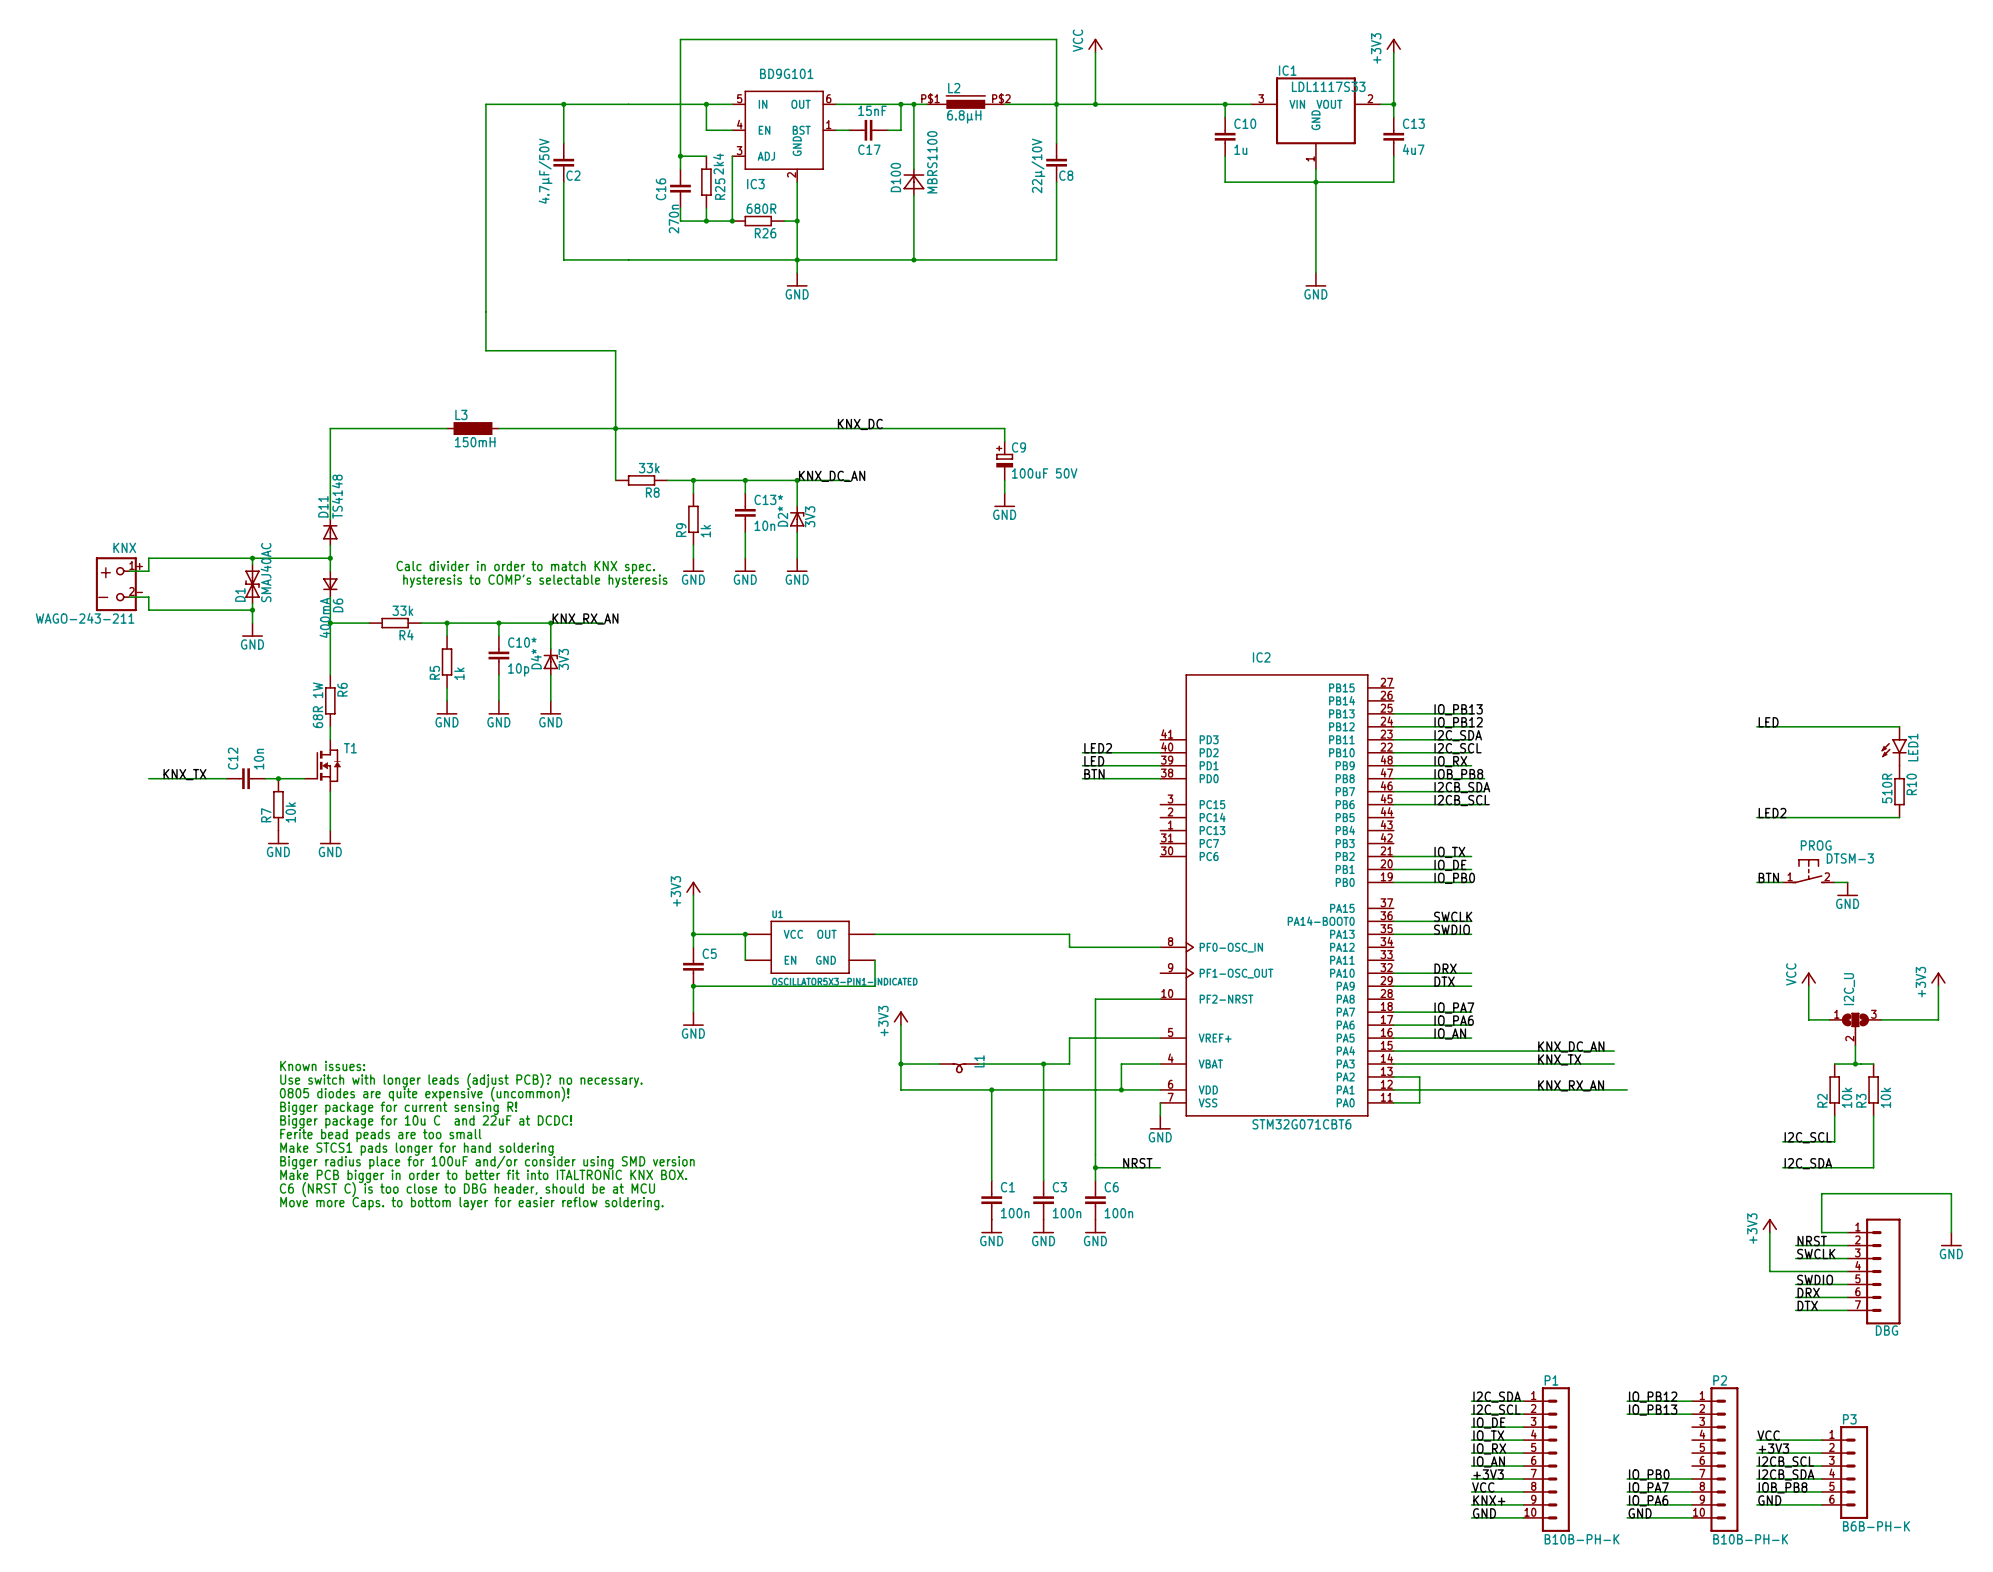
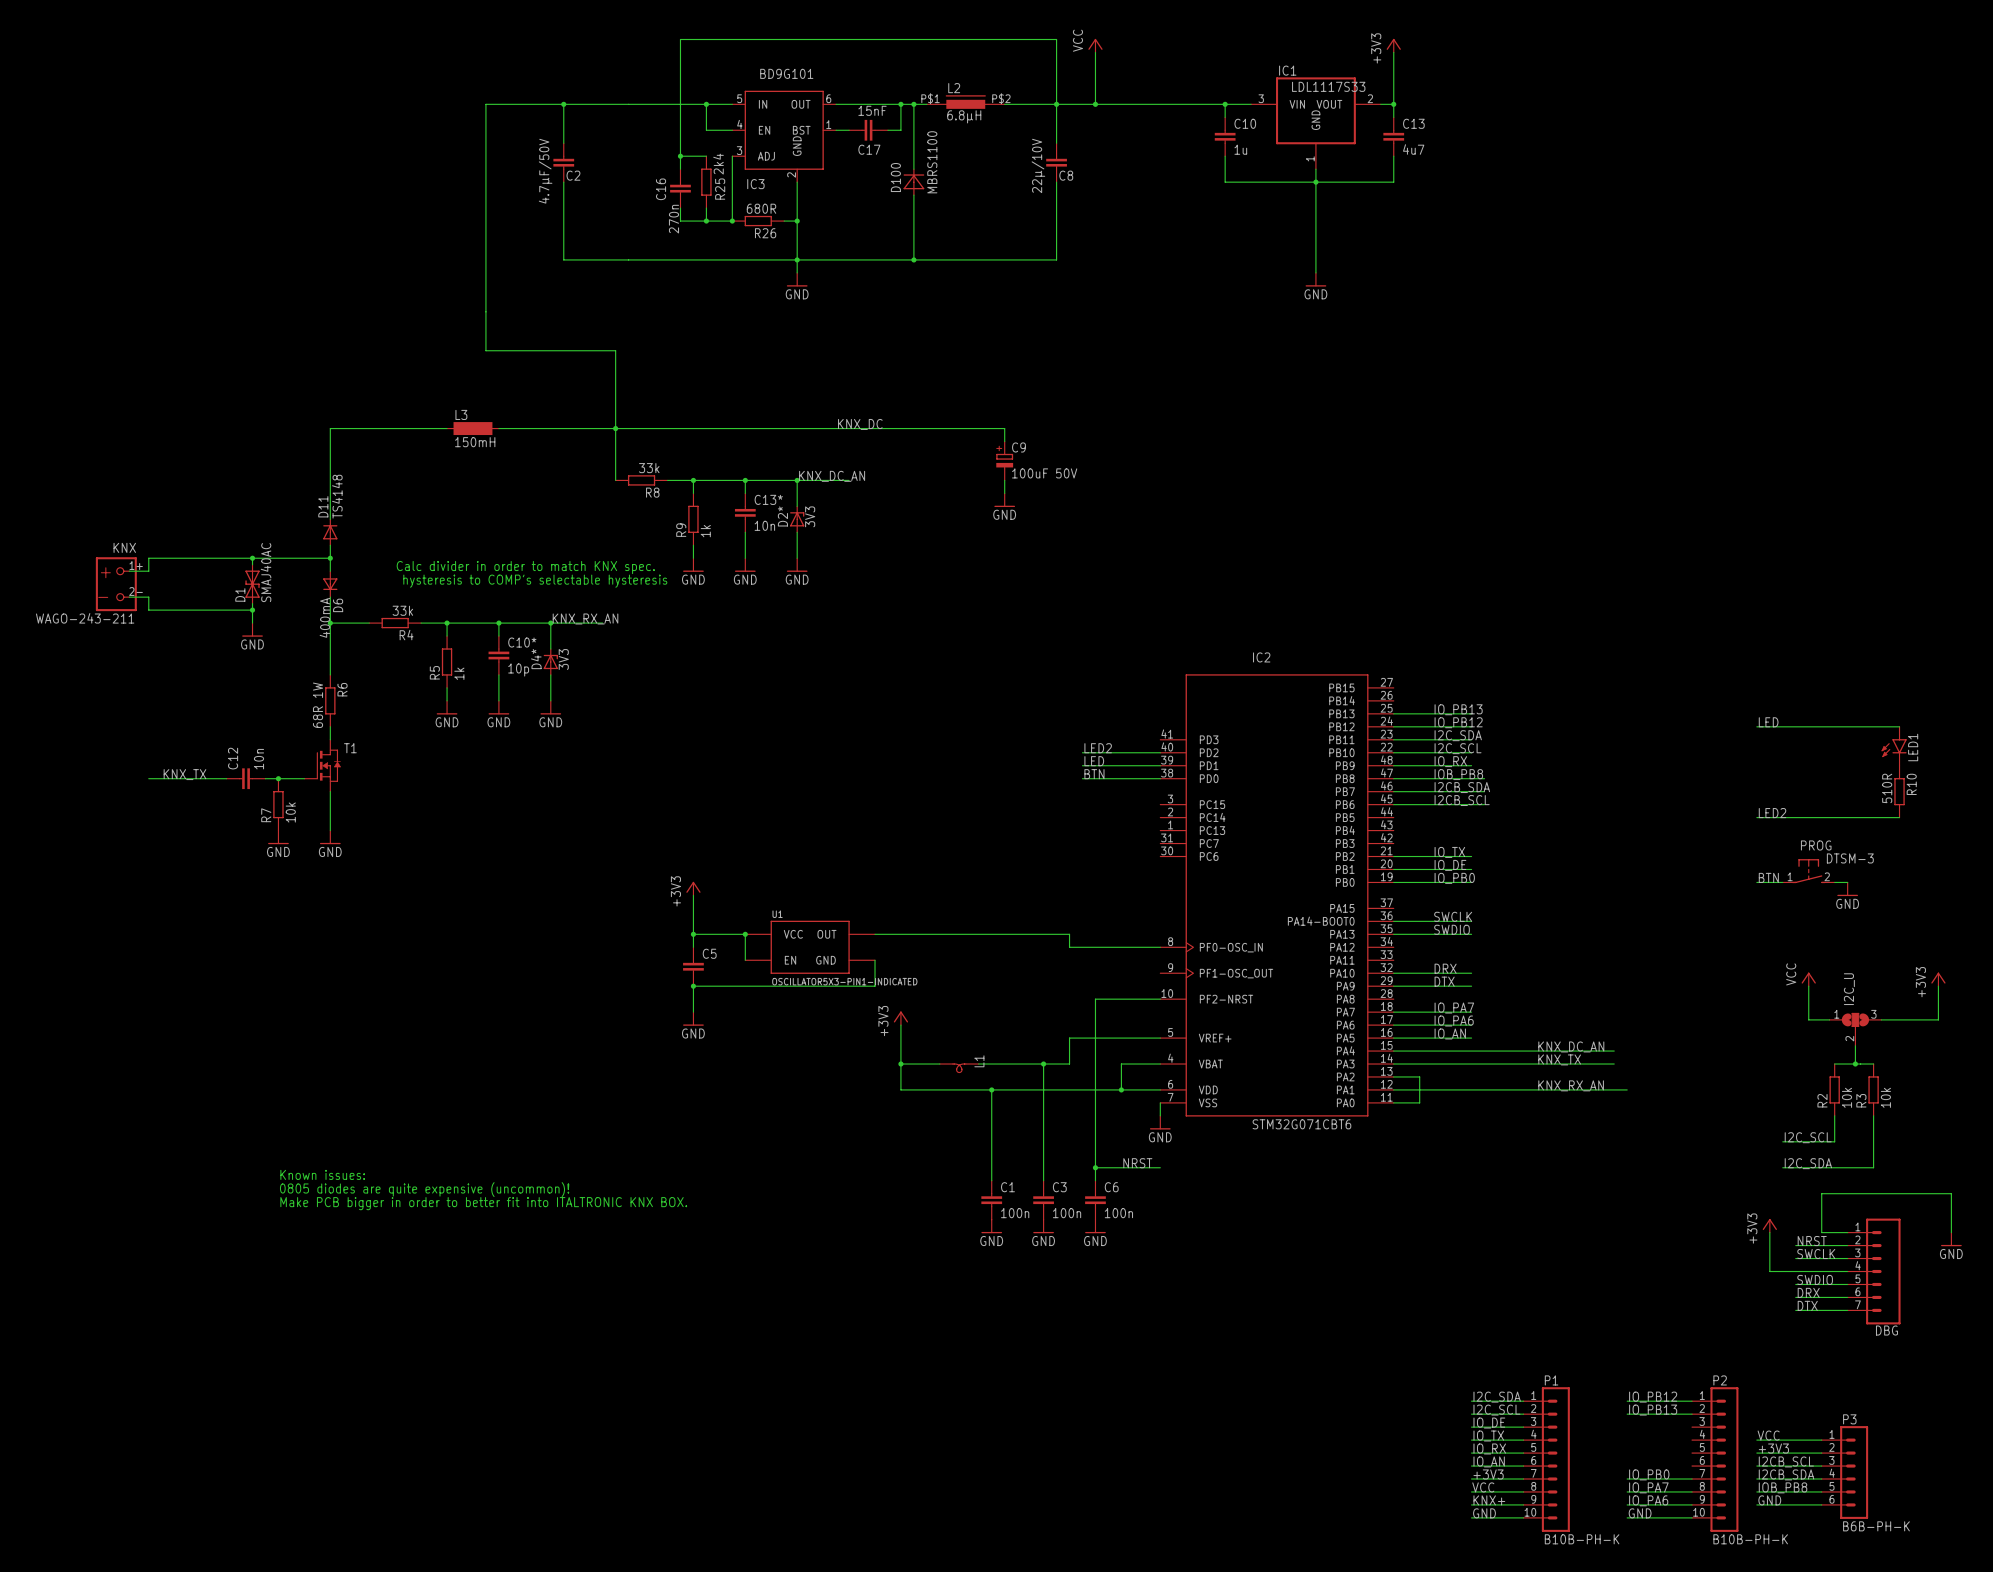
text: Known issues: (322, 1065) -> none
text: Use switch with longer leads (adjust PCB)? no necessary. (461, 1080) -> none
text: 0805 diodes are quite expensive (uncommon)! (424, 1094) -> none
text: Bigger package for current sensing R! (398, 1108) -> none
text: Bigger package for 10u C and 22uF at DCDC! (426, 1121) -> none
text: Ferite bead peads are too small (380, 1135) -> none
text: Make STCS1 pads longer for hand soldering (416, 1149) -> none
text: Bigger radius place for 100uF and/or consider using SMD version (487, 1162) -> none
text: Make PCB bigger in order to better fit into ITALTRONIC KNX BOX. (483, 1176) -> Known issues: (322, 1174)
text: C6 (NRST C) is too close to DBG header, should be at MCU (467, 1189) -> 0805 diodes are quite expensive (uncommon)! (424, 1189)
text: Move more Caps. to bottom layer for easier reflow soldering. (471, 1203) -> Make PCB bigger in order to better fit into ITALTRONIC KNX BOX. (483, 1203)

